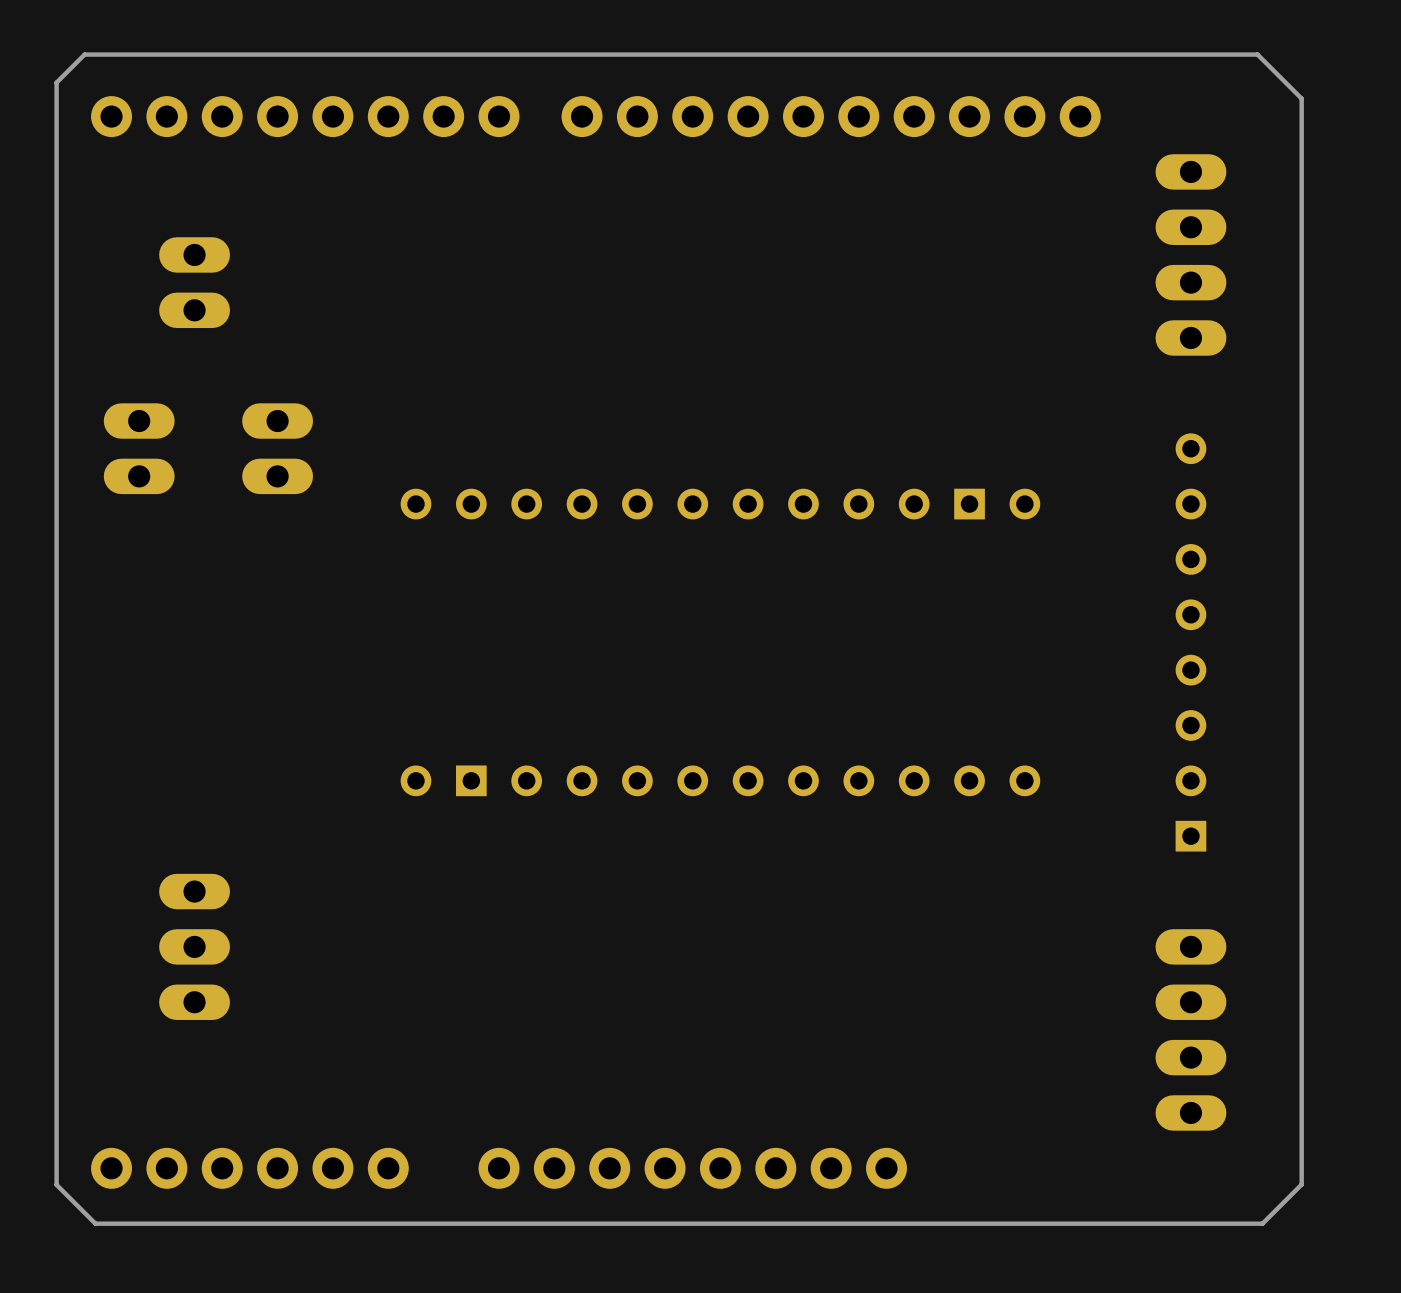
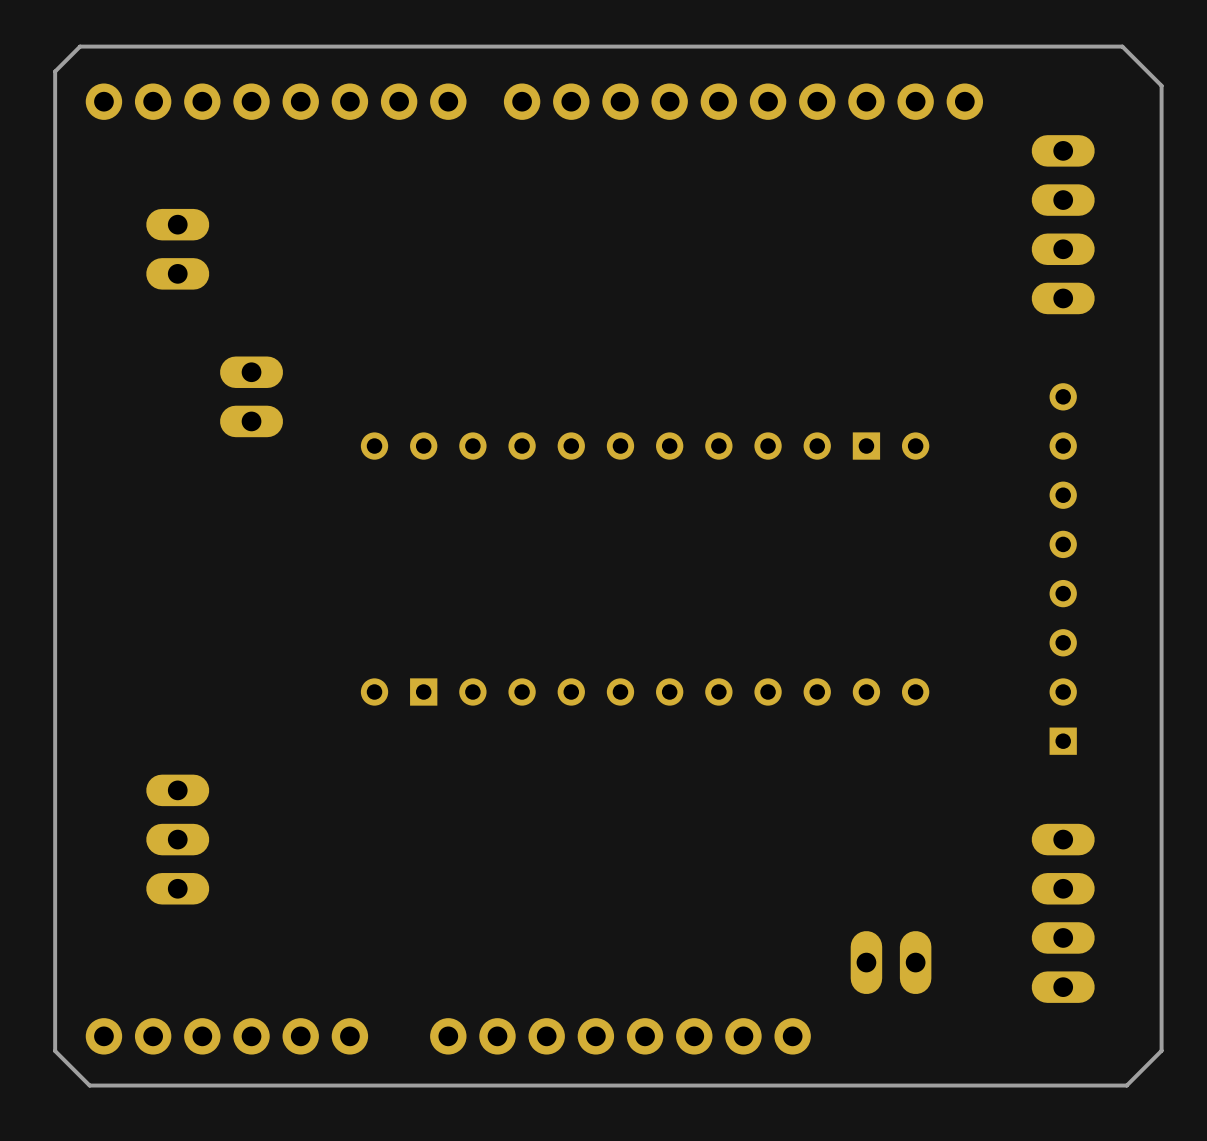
part: (139, 448) -> none
part: none -> (891, 962)

